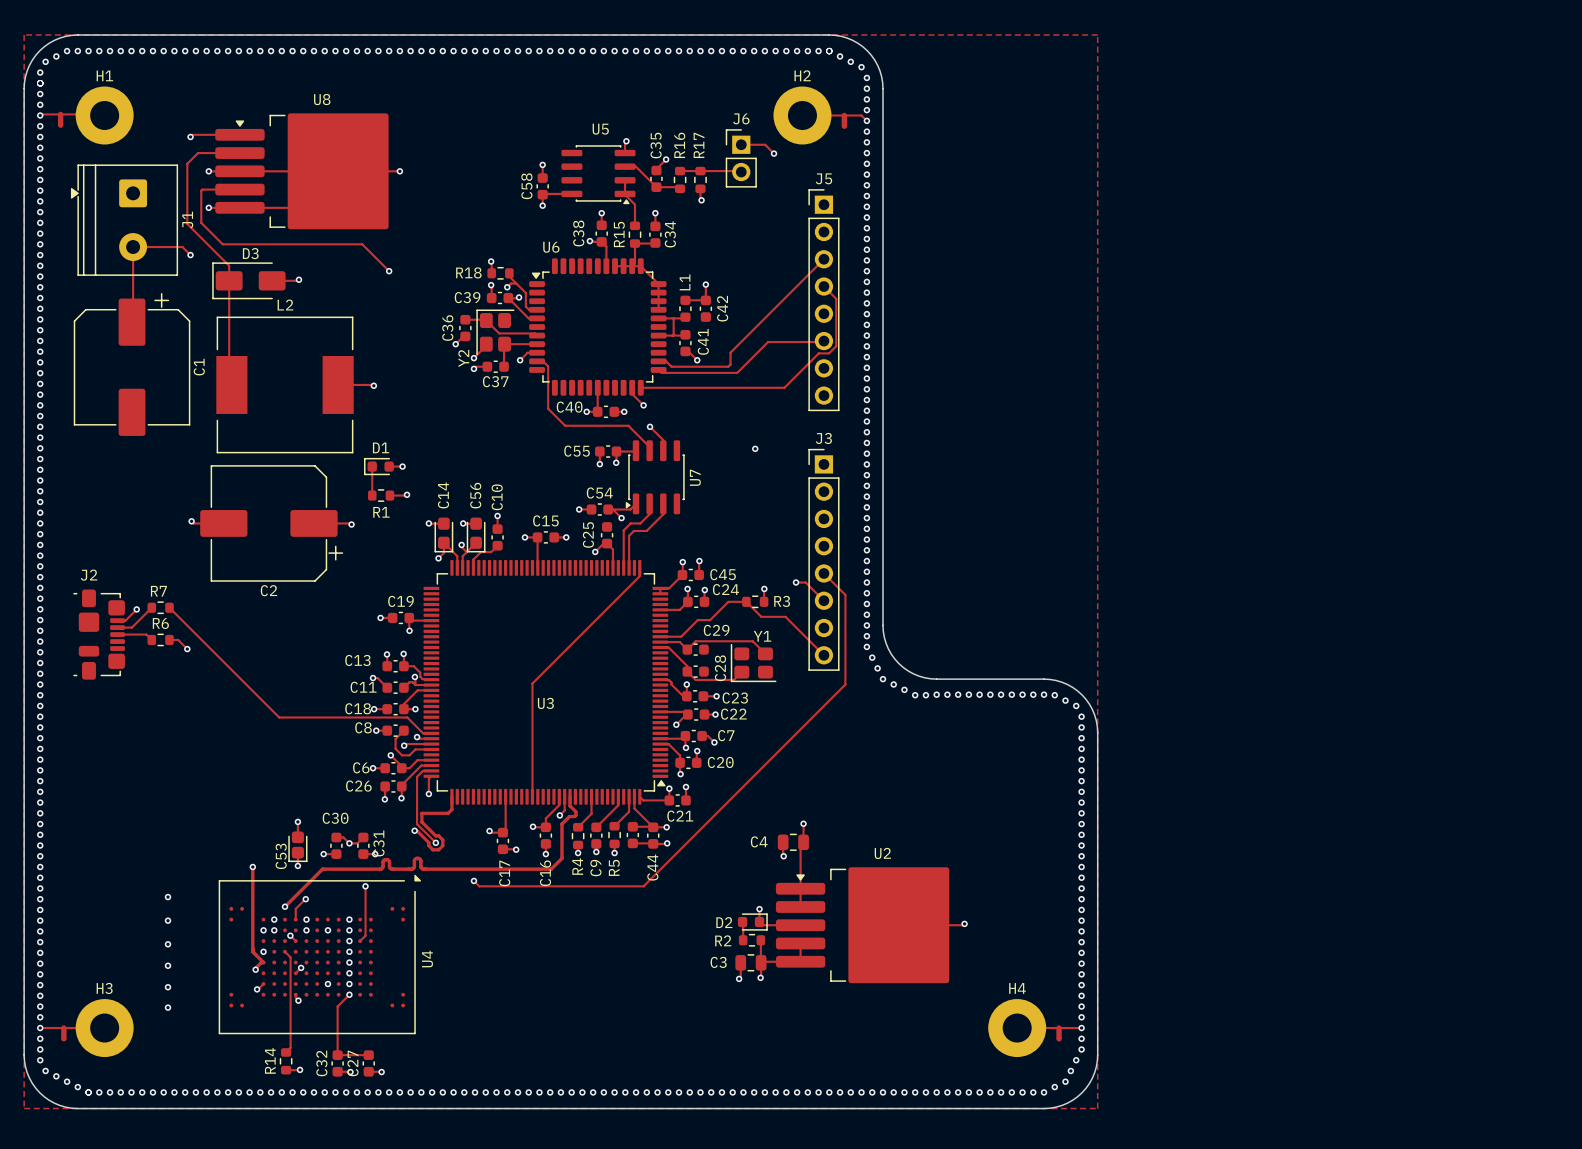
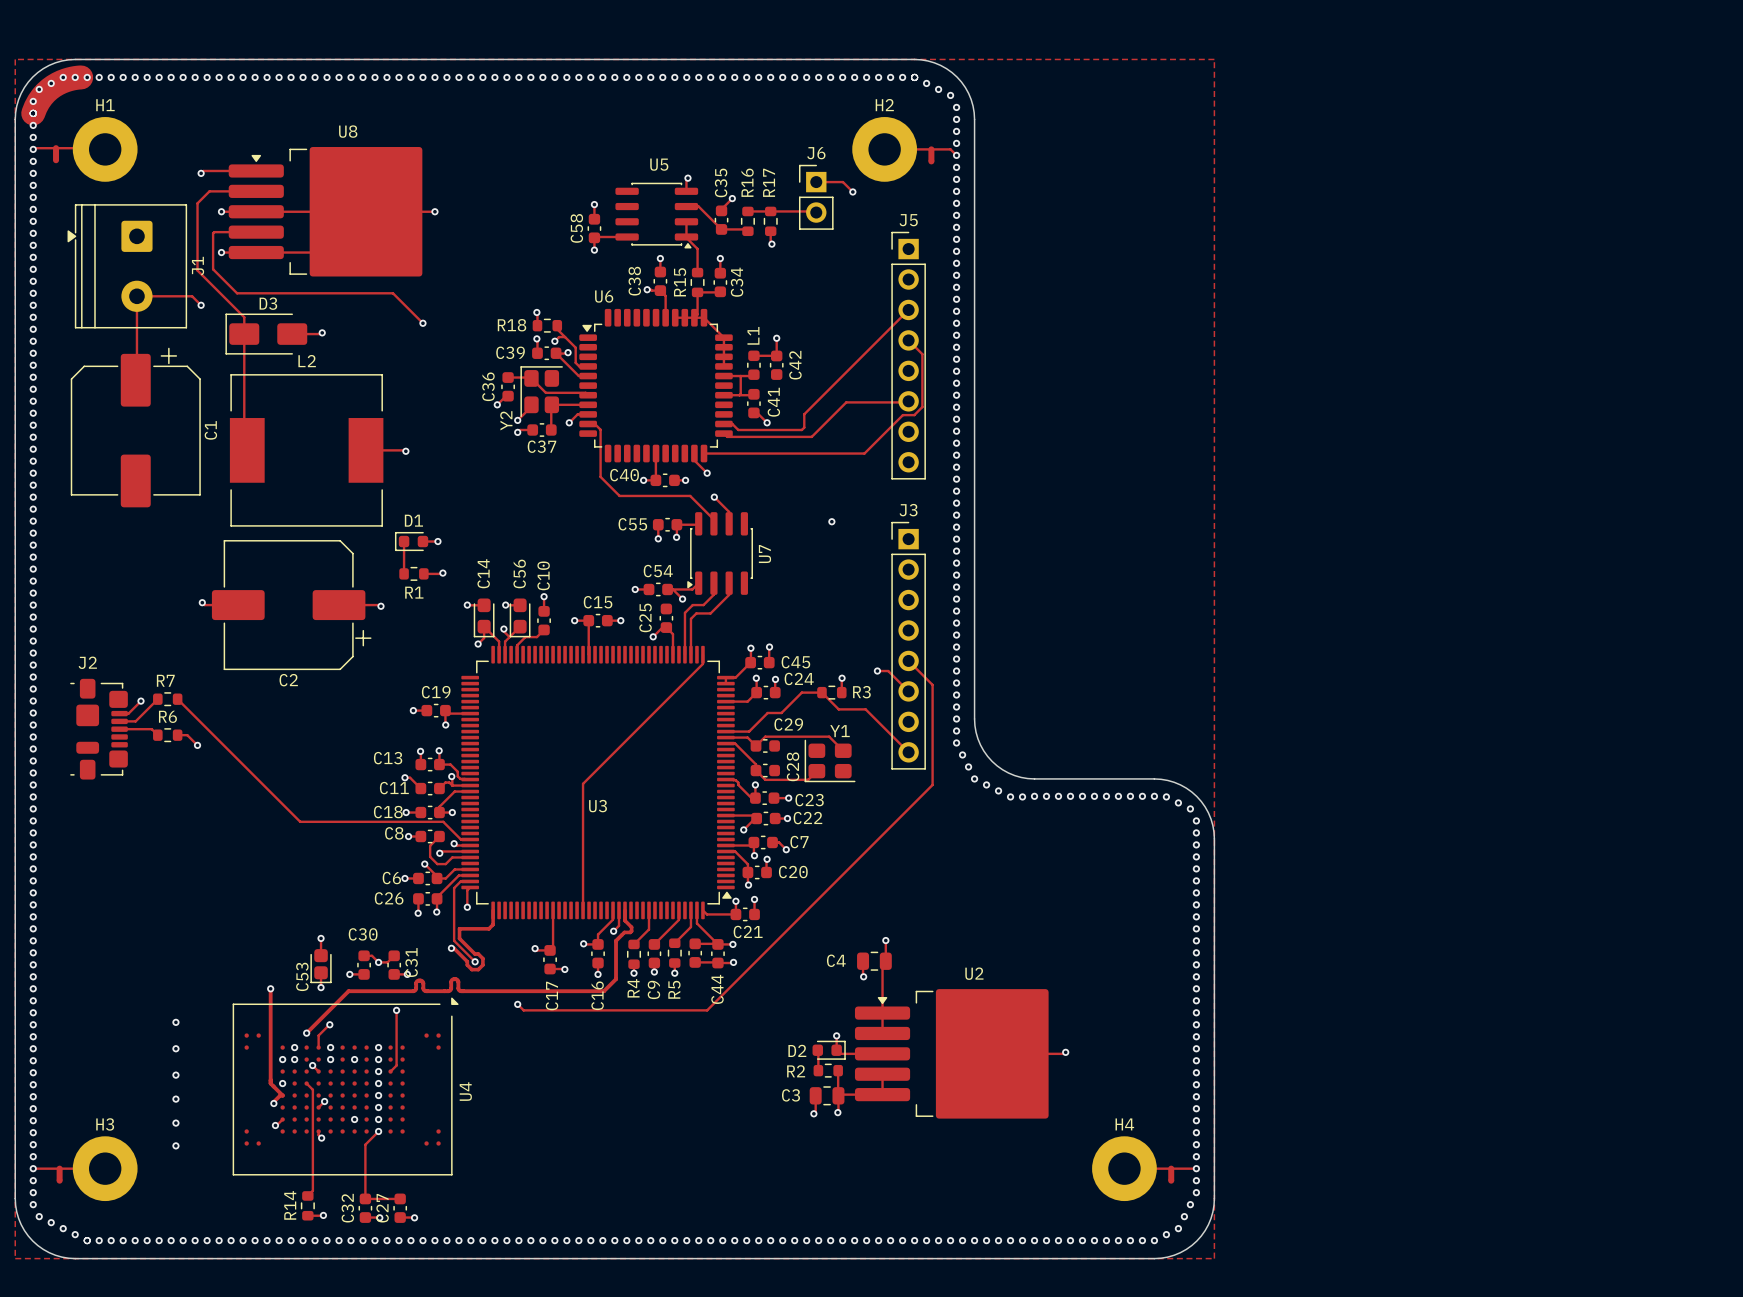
track: none -> (81, 77) (65, 80) (49, 89) (38, 101) (33, 113)

